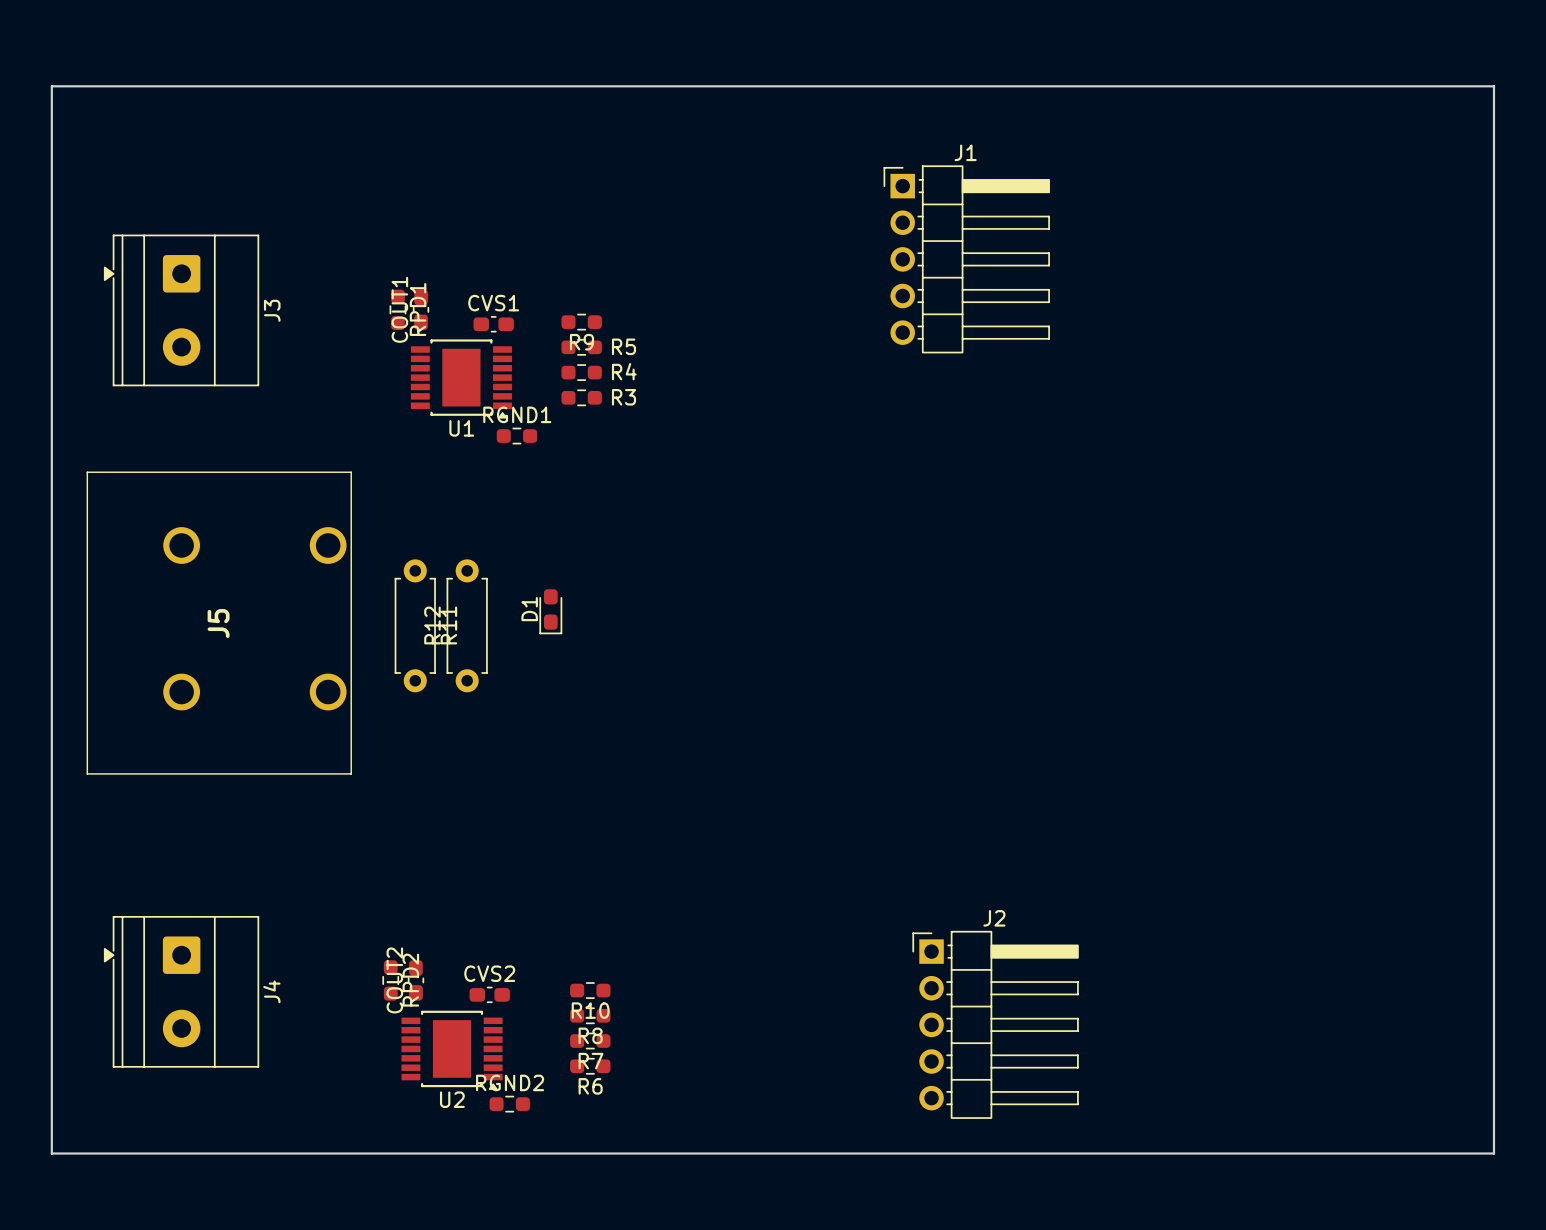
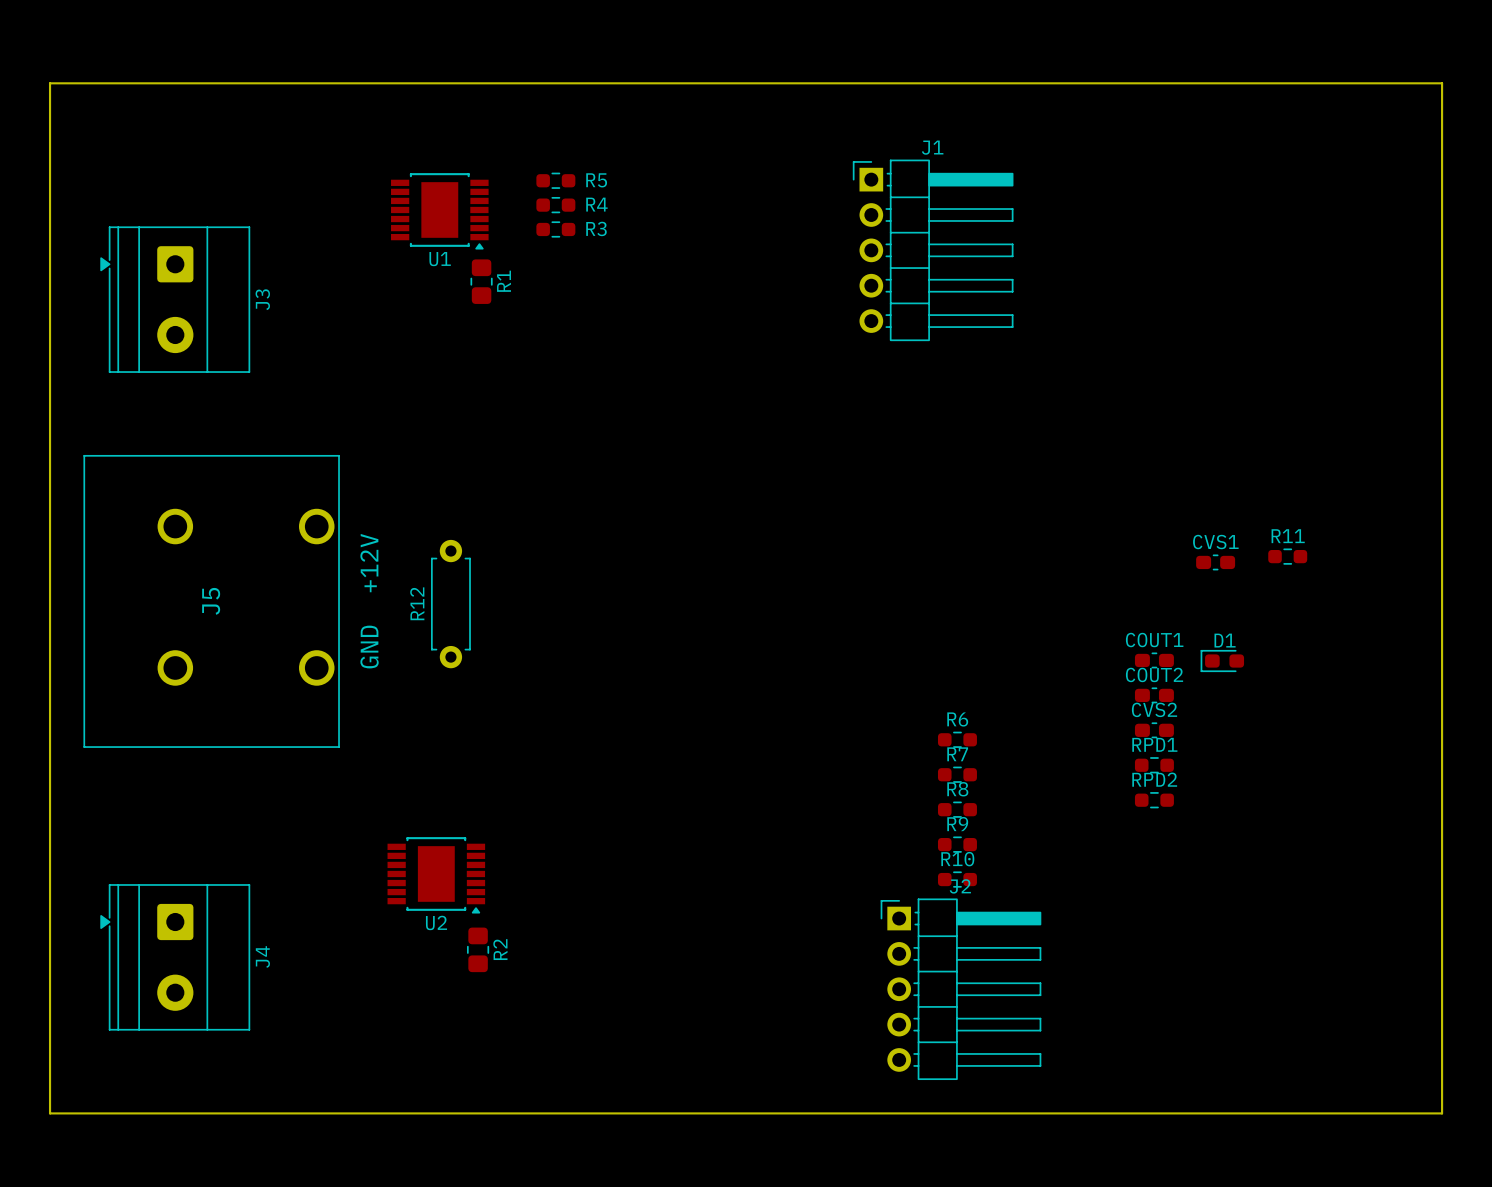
R1: none -> (481, 281)
RPD1 rotation: 0° (397, 309) -> 90° clockwise (1154, 765)
RPD1 position: (397, 309) -> (1154, 765)
RPD1 name position: RPD1 (418, 309) -> RPD1 (1154, 744)
COUT1 rotation: 0° (421, 309) -> 90° clockwise (1154, 660)
COUT1 position: (421, 309) -> (1154, 660)
R9 position: (581, 322) -> (957, 844)
CVS1 position: (493, 324) -> (1215, 562)
R9 name position: R9 (581, 342) -> R9 (957, 824)
R5 position: (581, 347) -> (555, 180)
R4 position: (581, 372) -> (555, 205)
U1 position: (461, 379) -> (439, 211)
R3 position: (581, 397) -> (555, 229)
RGND1: (516, 436) -> none
R11 footprint: [394, 559, 436, 693] -> [1268, 548, 1308, 565]
D1 rotation: 0° (550, 611) -> 90° clockwise (1222, 661)
D1 position: (550, 611) -> (1222, 661)
J5 value: none -> GND +12V (369, 601)
R11 name position: R11 (448, 625) -> R11 (1288, 536)
RPD2 rotation: 0° (390, 980) -> 90° clockwise (1154, 800)
RPD2 position: (390, 980) -> (1154, 800)
RPD2 name position: RPD2 (410, 980) -> RPD2 (1154, 779)
COUT2 rotation: 0° (415, 980) -> 90° clockwise (1154, 695)
COUT2 position: (415, 980) -> (1154, 695)
R2: none -> (478, 949)
R10 position: (590, 990) -> (957, 879)
CVS2 position: (489, 994) -> (1154, 730)
R10 name position: R10 (590, 1010) -> R10 (957, 859)
R8 position: (590, 1015) -> (957, 809)
R8 name position: R8 (590, 1035) -> R8 (957, 789)
R7 position: (590, 1041) -> (957, 774)
U2 position: (452, 1050) -> (436, 875)
R7 name position: R7 (590, 1061) -> R7 (957, 754)
R6 position: (590, 1066) -> (957, 739)
R6 name position: R6 (590, 1086) -> R6 (957, 719)
RGND2: (509, 1104) -> none

